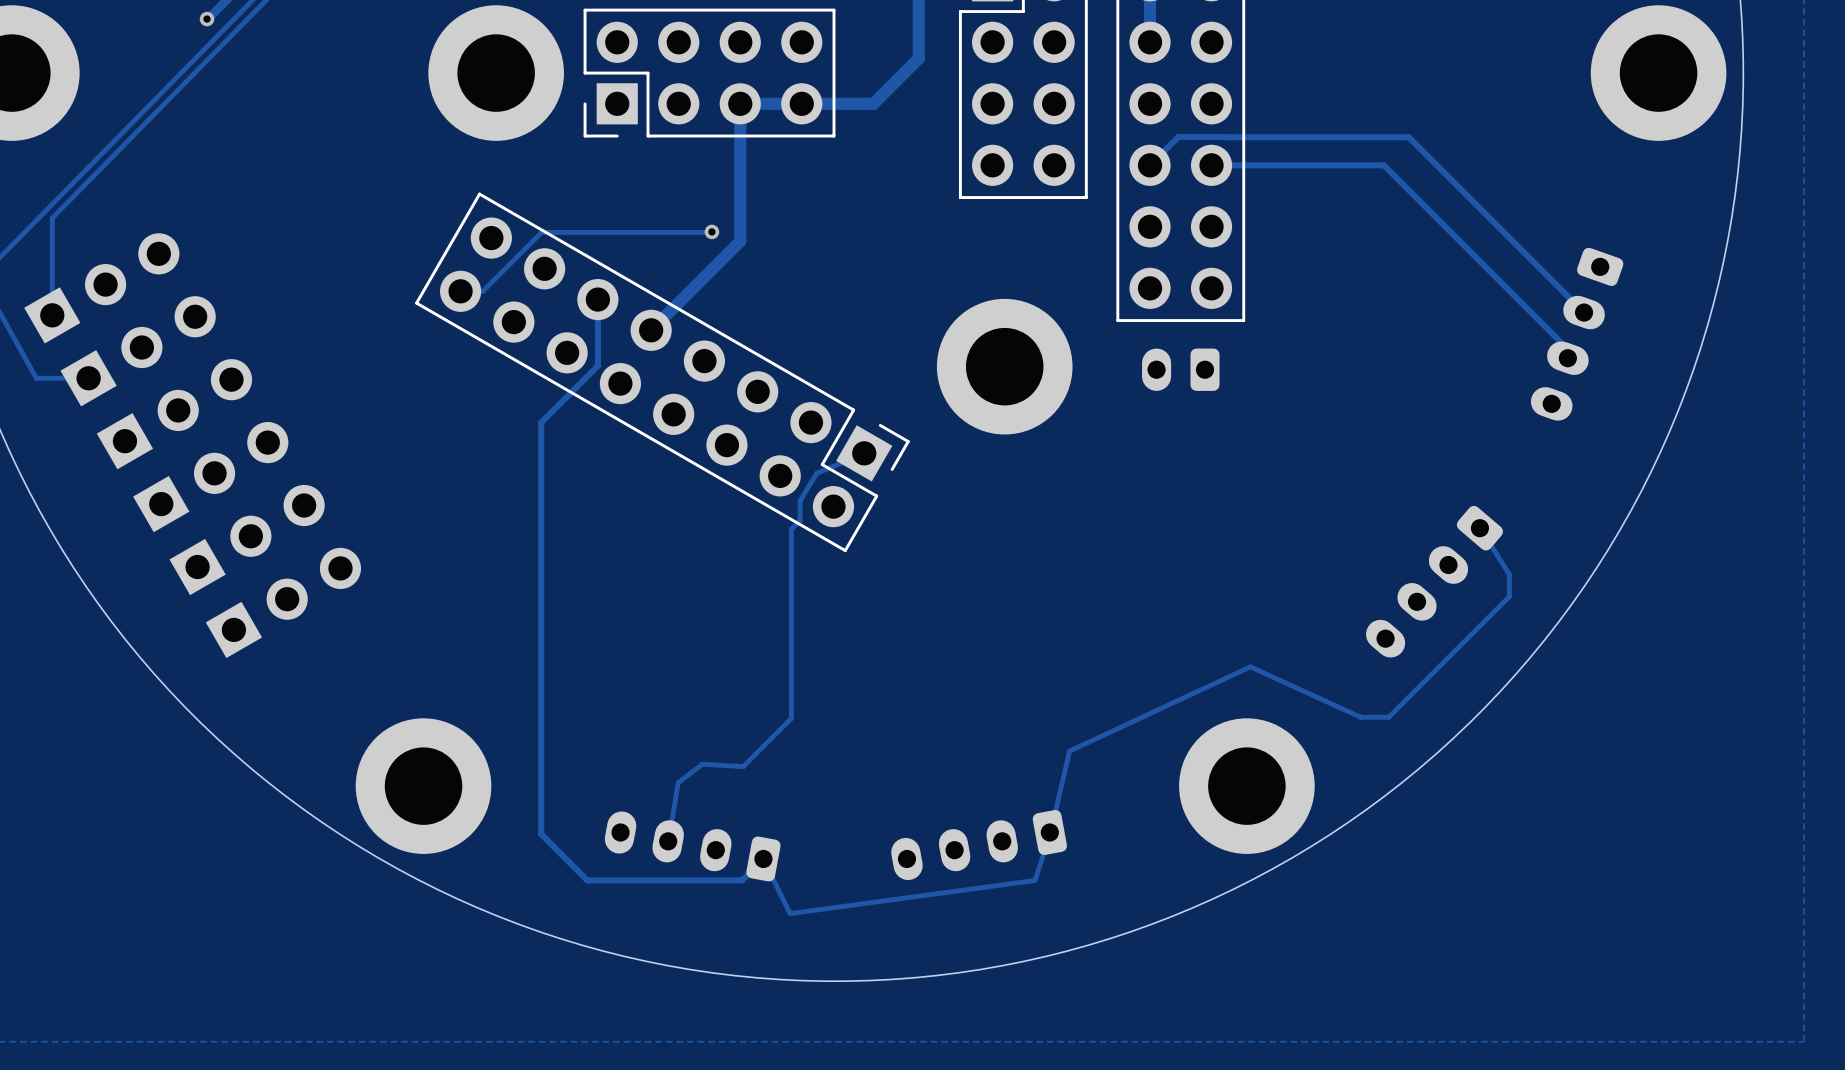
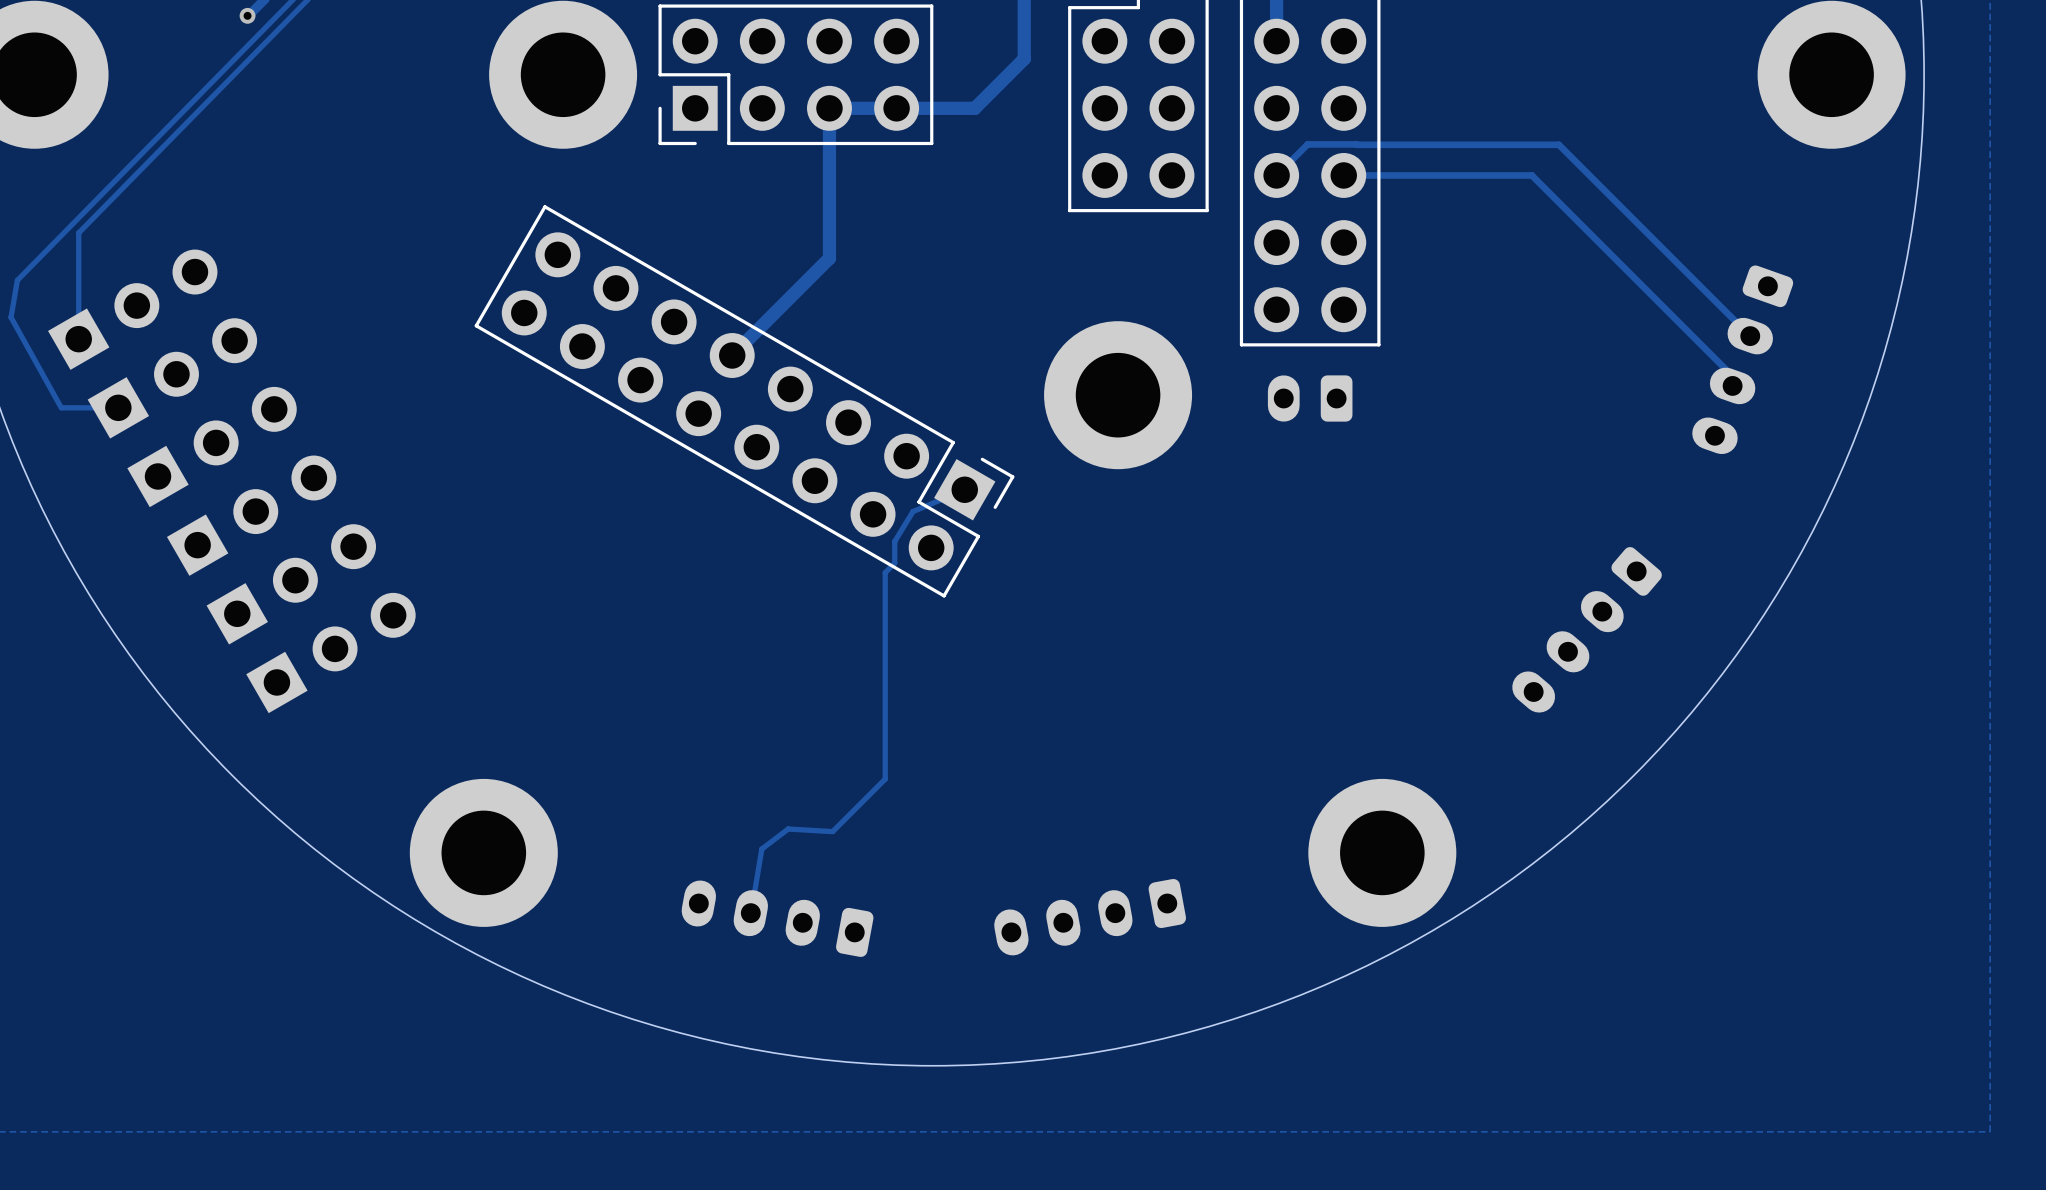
via: (711, 231) -> none
track: (709, 232) (711, 231) (541, 232) (482, 291) (460, 291) -> none
track: (597, 299) (597, 365) (541, 422) (541, 834) (587, 880) (741, 880) (763, 858) -> none
track: (1481, 529) (1509, 574) (1509, 596) (1388, 717) (1360, 717) -> none
track: (1360, 716) (1250, 666) (1069, 751) (1050, 832) (1034, 880) (790, 913) (762, 857) -> none

